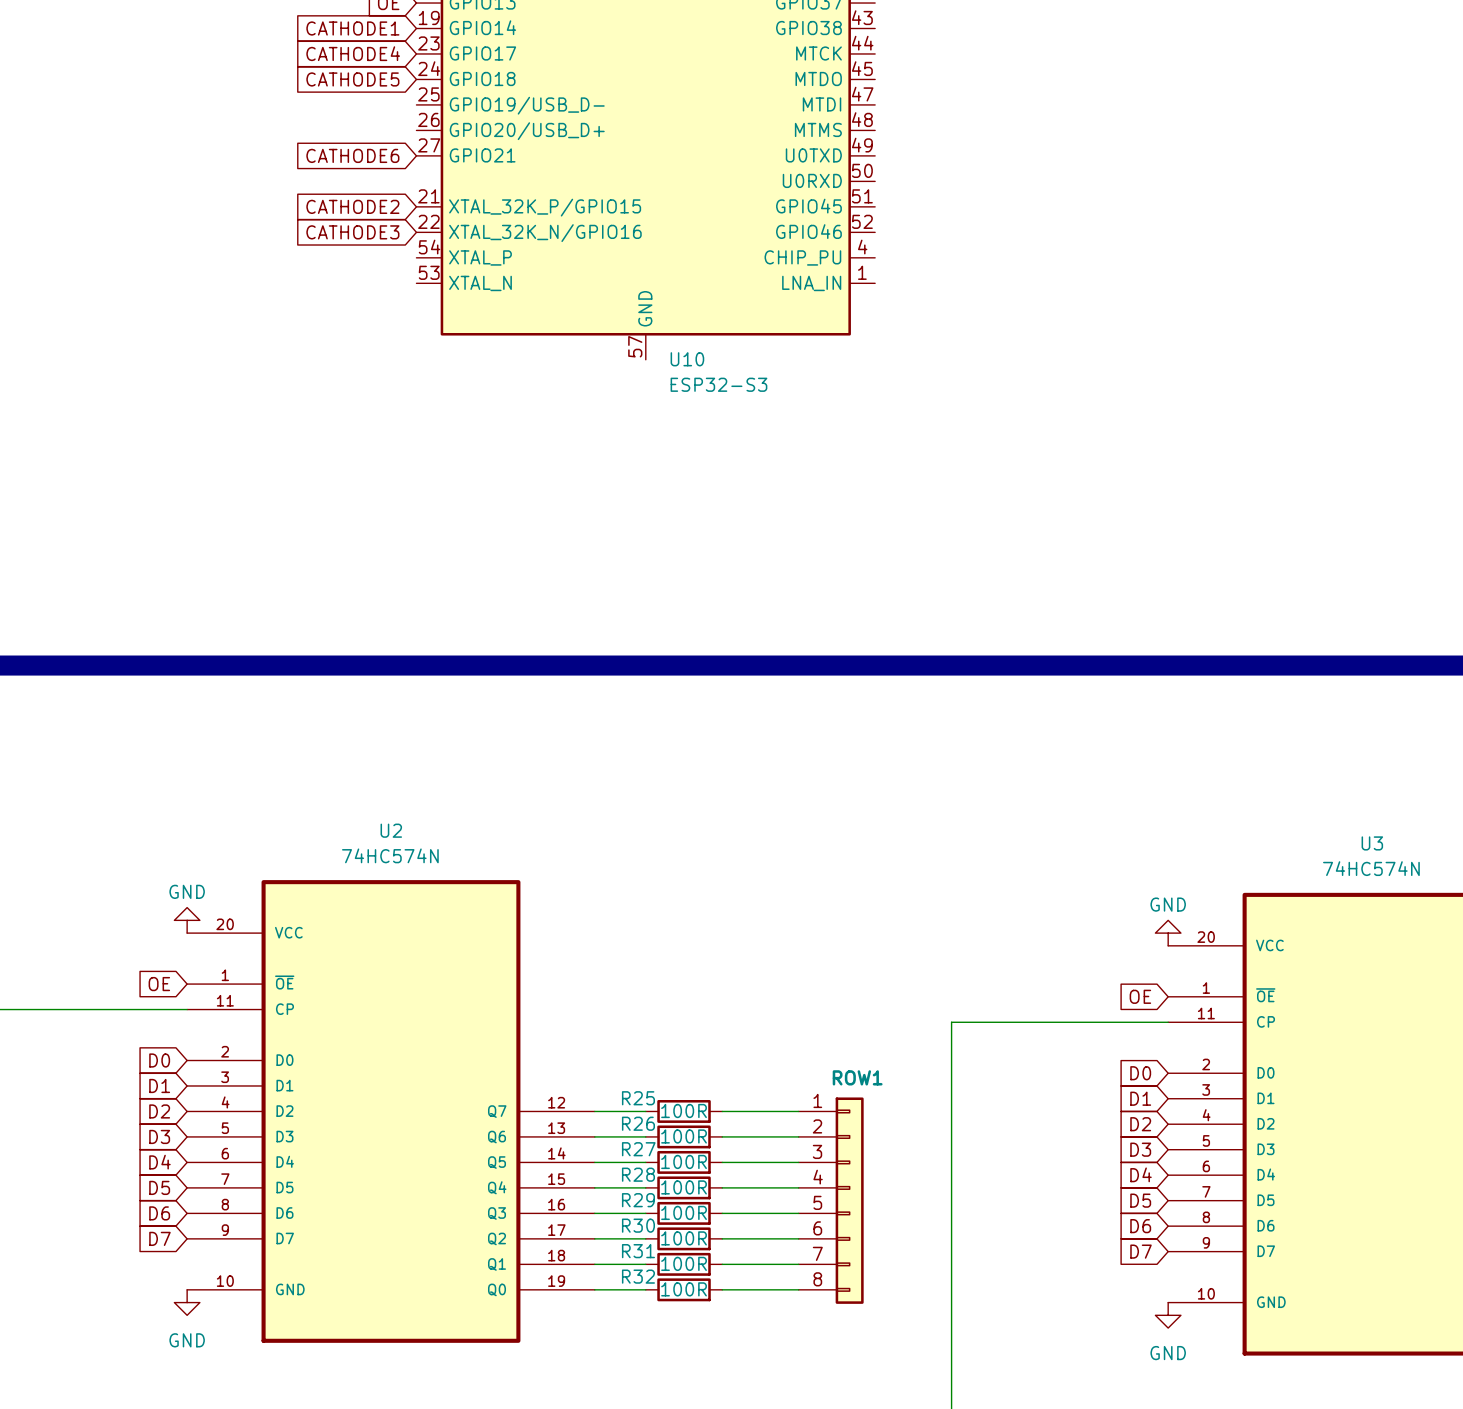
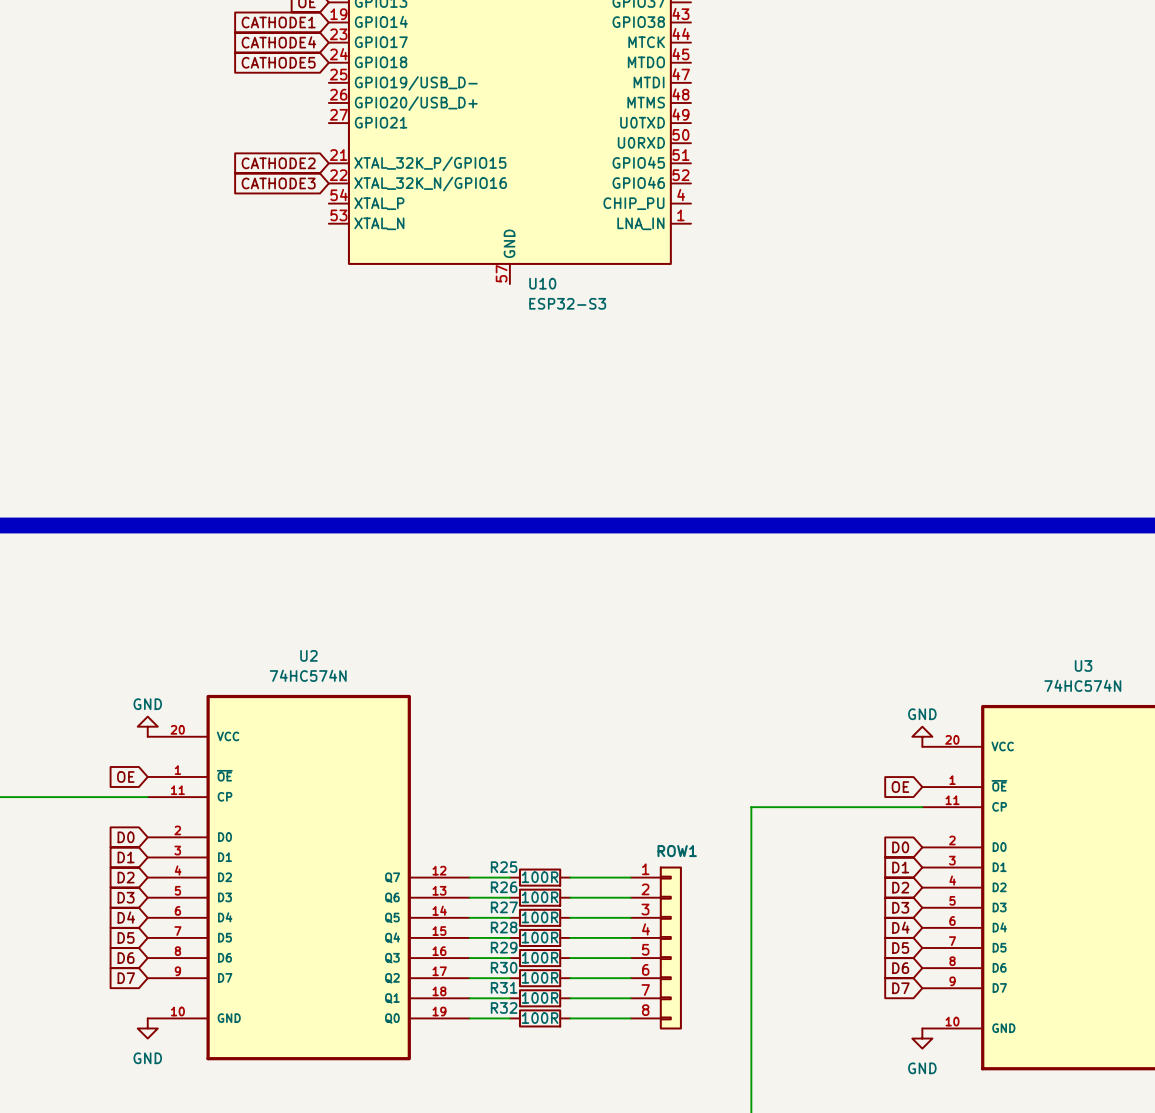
global label: CATHODE6 (352, 155) -> none

